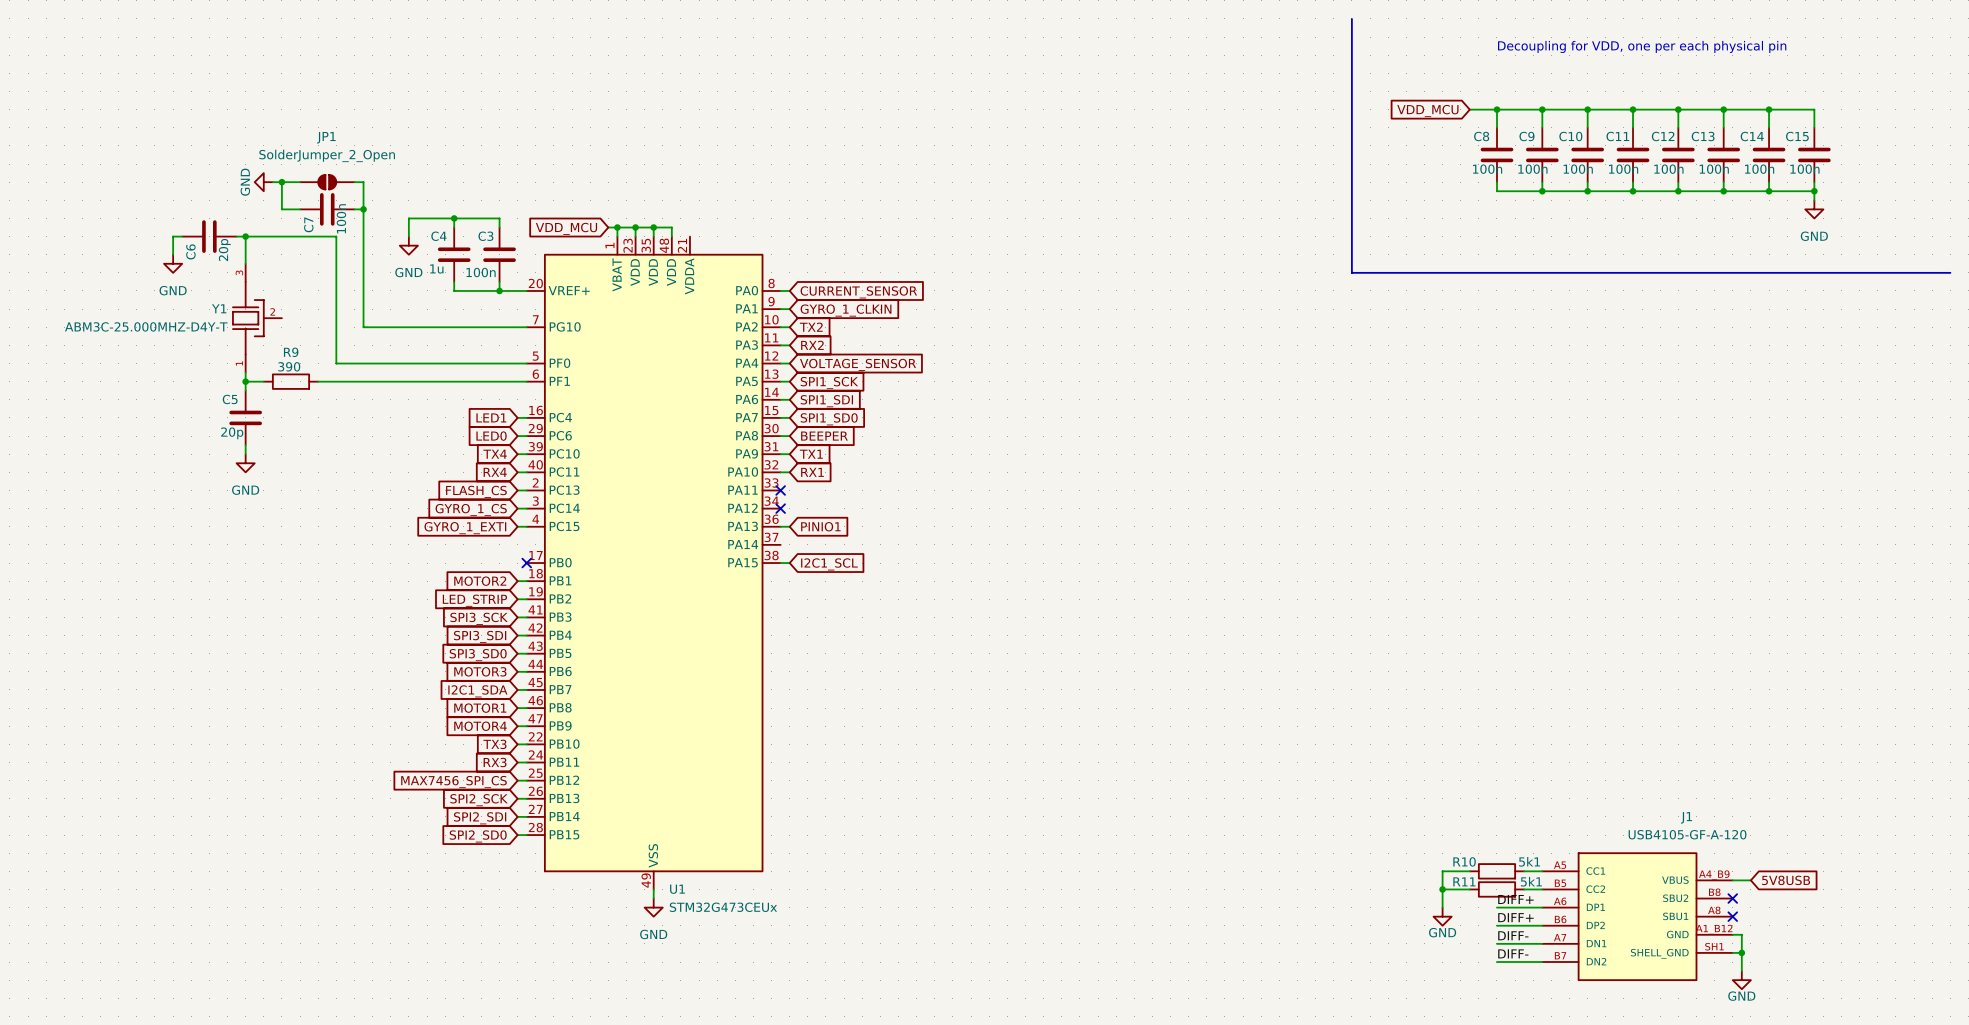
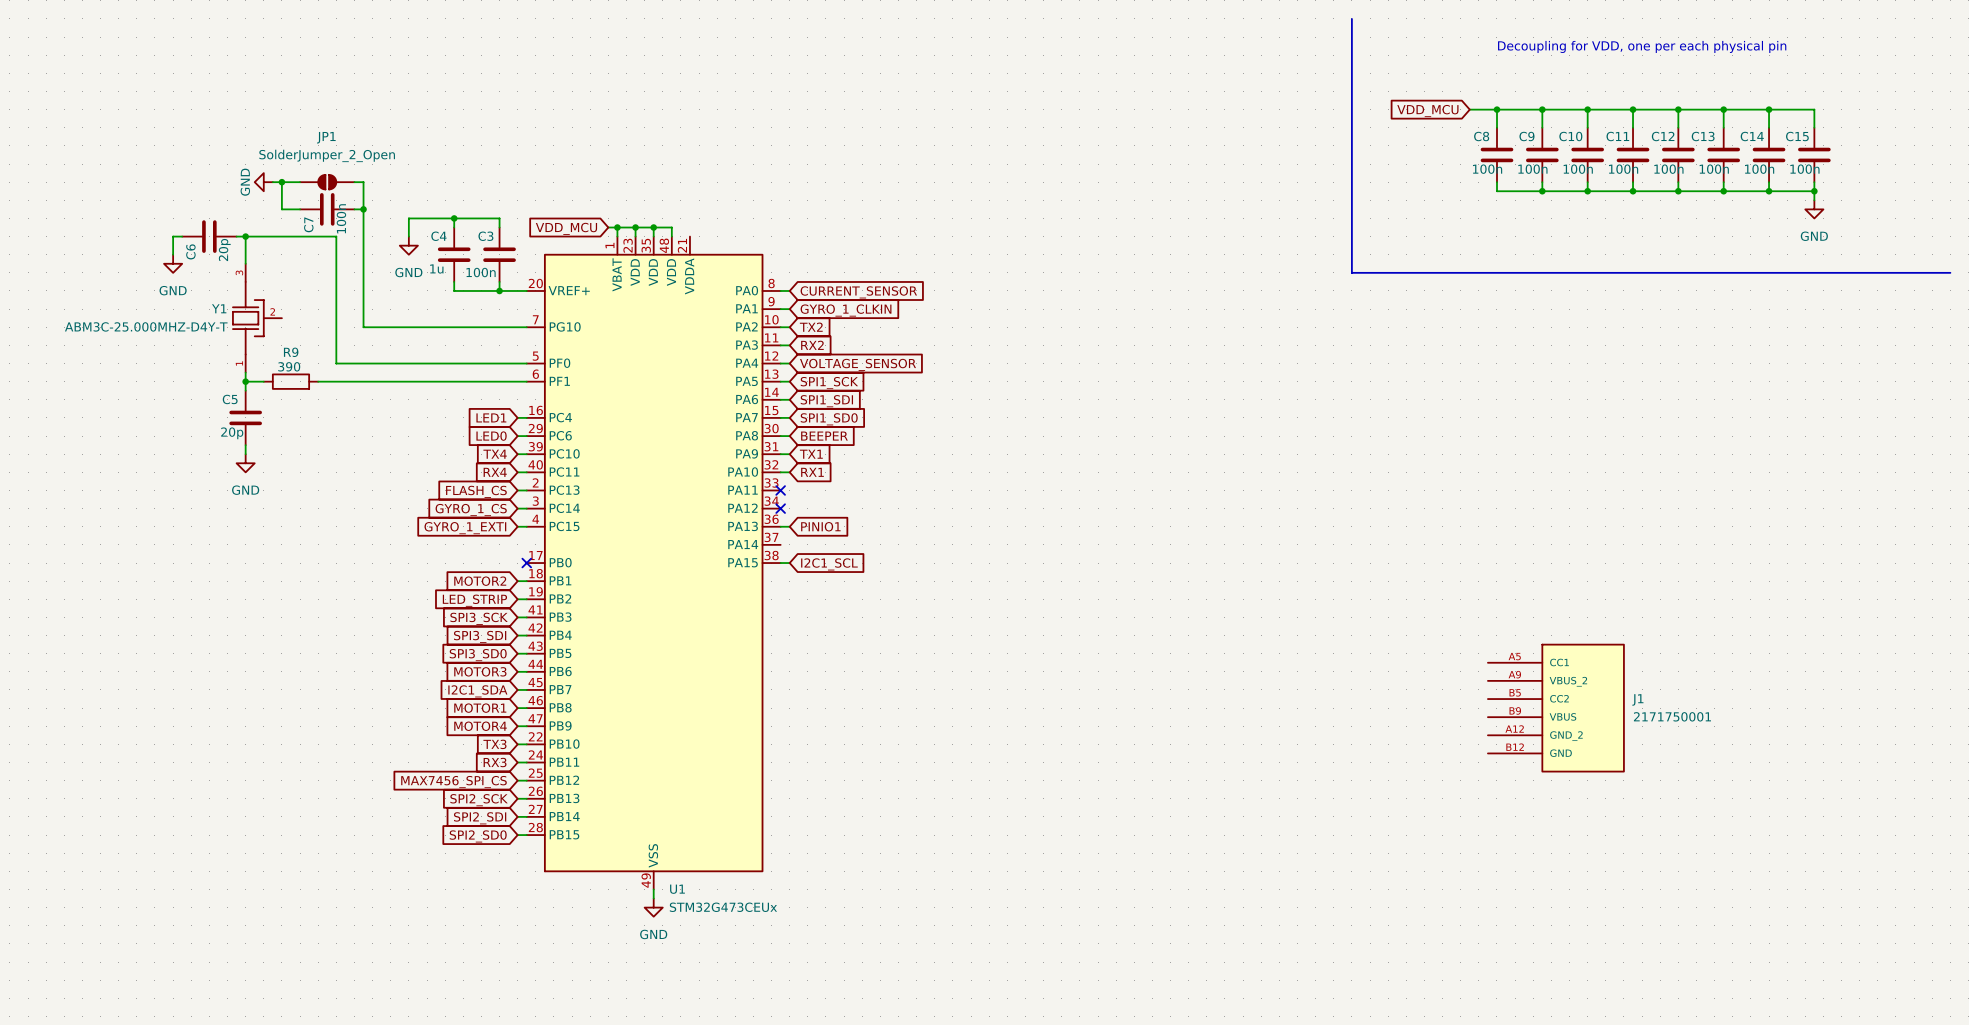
J1 name position: J1 (1686, 817) -> J1 (1637, 699)
J1 value: USB4105-GF-A-120 (1687, 834) -> 2171750001 (1672, 716)
J1 symbol: [1542, 852, 1733, 982] -> [1487, 644, 1624, 772]
wire: (1469, 871) (1442, 871) (1442, 907) -> none
R10: 5k1 (1496, 871) -> none
wire: (1524, 871) (1542, 871) -> none
wire: (1732, 880) (1750, 880) -> none
global label: 5V8USB (1786, 880) -> none
wire: (1442, 889) (1469, 889) -> none
junction: (1442, 889) -> none
R11: 5k1 (1496, 889) -> none
wire: (1524, 889) (1542, 889) -> none
no-connect mark: (1732, 898) -> none
label: DIFF+ (1515, 899) -> none
wire: (1496, 907) (1542, 907) -> none
power symbol: GND (1442, 916) -> none
no-connect mark: (1732, 916) -> none
label: DIFF+ (1515, 917) -> none
wire: (1496, 925) (1542, 925) -> none
wire: (1732, 934) (1741, 934) (1741, 971) -> none
label: DIFF- (1513, 935) -> none
wire: (1496, 943) (1542, 943) -> none
wire: (1732, 952) (1741, 952) -> none
junction: (1741, 952) -> none
label: DIFF- (1513, 953) -> none
wire: (1496, 962) (1542, 962) -> none
power symbol: GND (1741, 980) -> none

